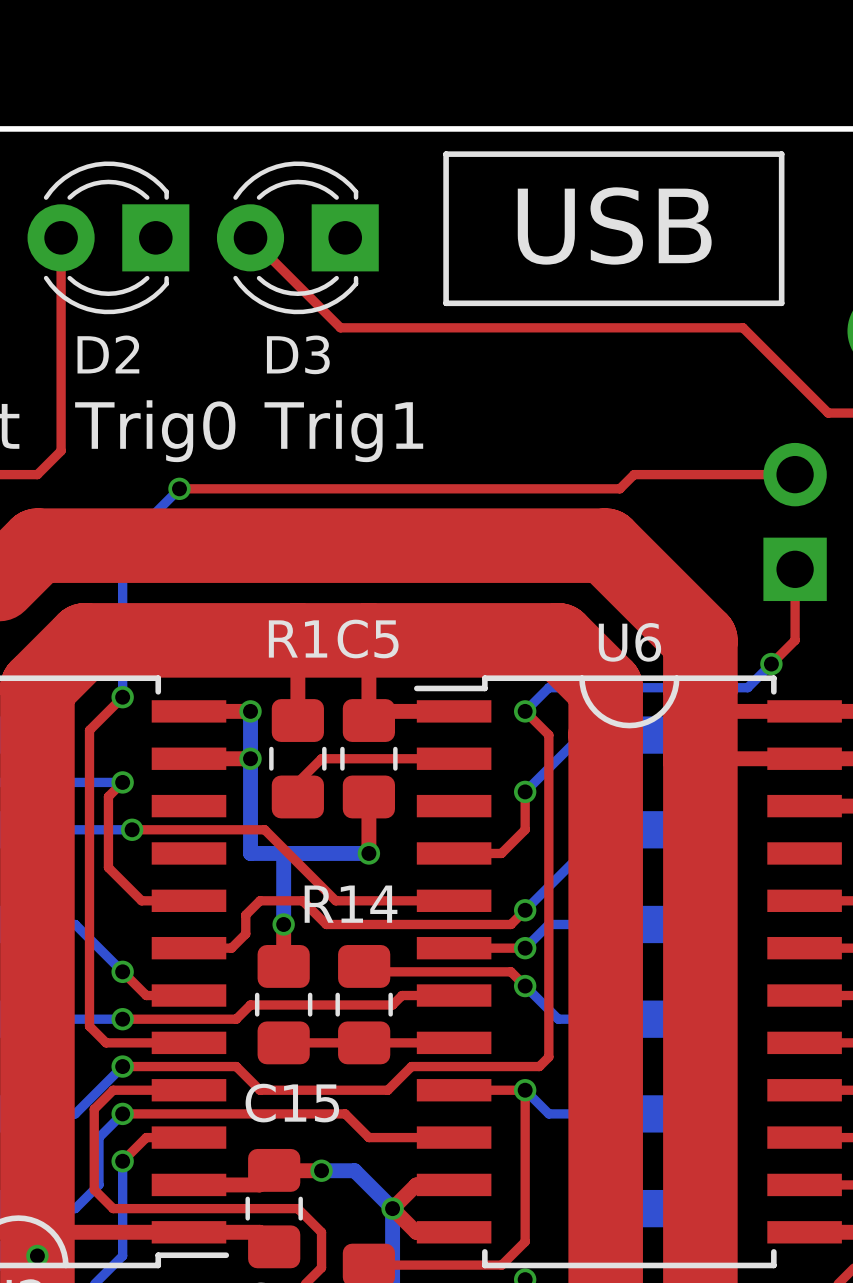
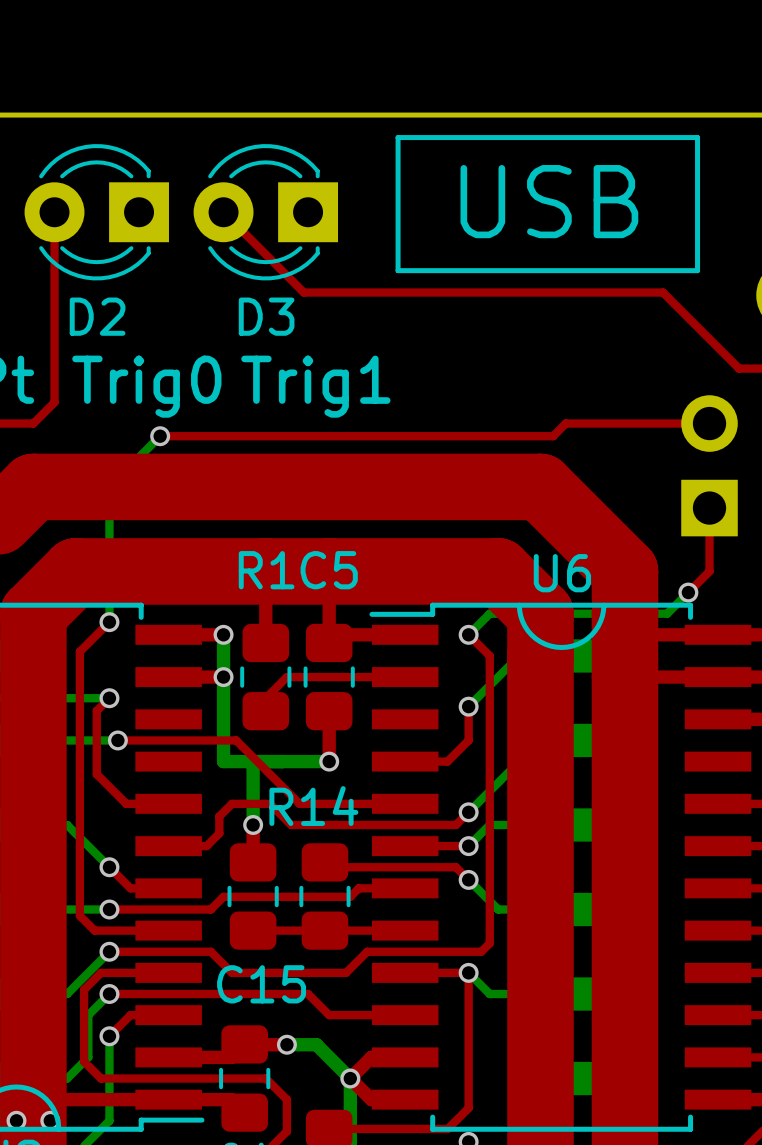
via: none -> (16, 1120)
via: (37, 1255) -> none
via: none -> (50, 1120)

